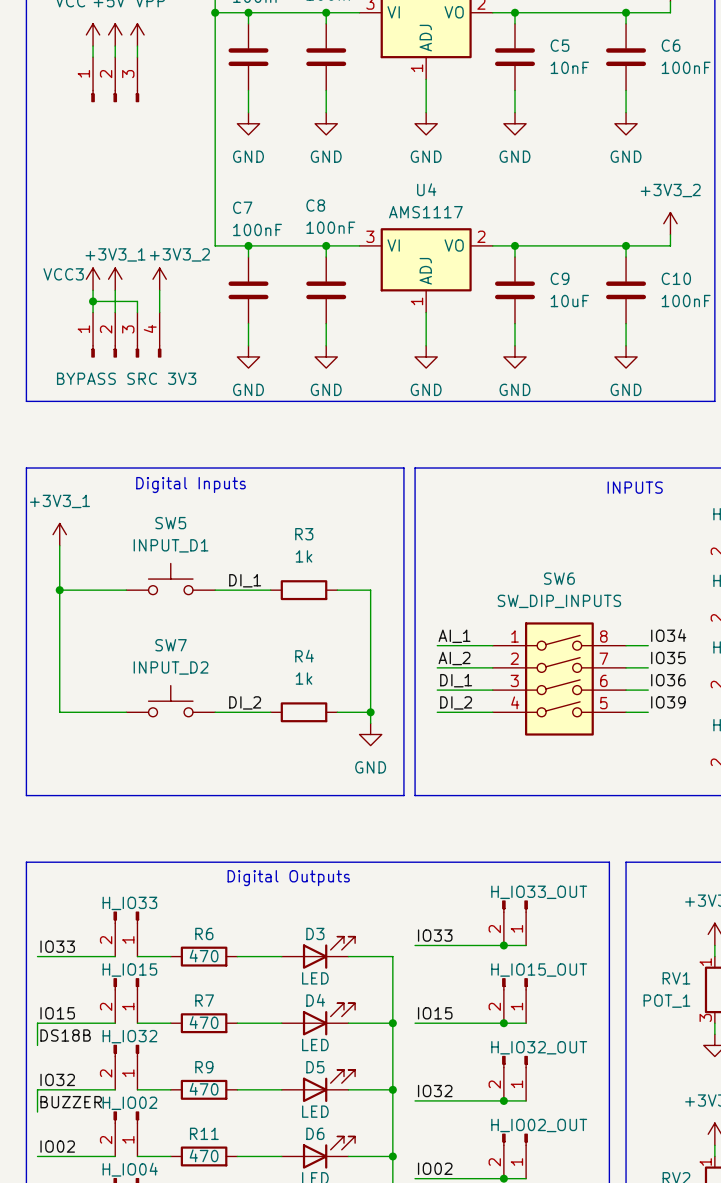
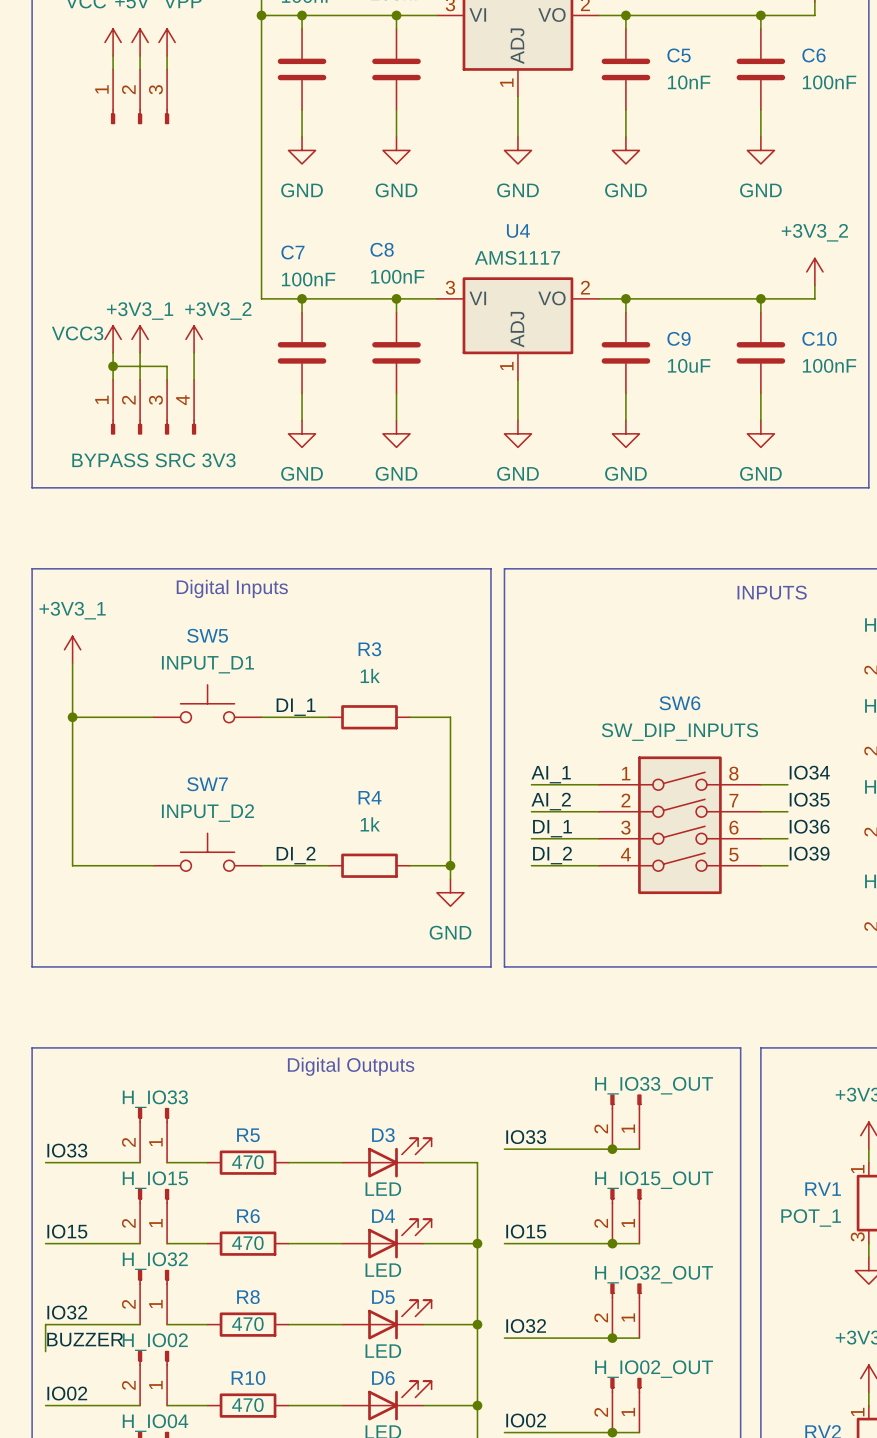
R6 name: R6 (204, 933) -> R5 (248, 1135)
R7 name: R7 (204, 1000) -> R6 (248, 1216)
wire: (37, 1023) (37, 1045) -> none
label: DS18B (65, 1035) -> none
R9 name: R9 (204, 1067) -> R8 (248, 1297)
R11 name: R11 (204, 1133) -> R10 (248, 1378)

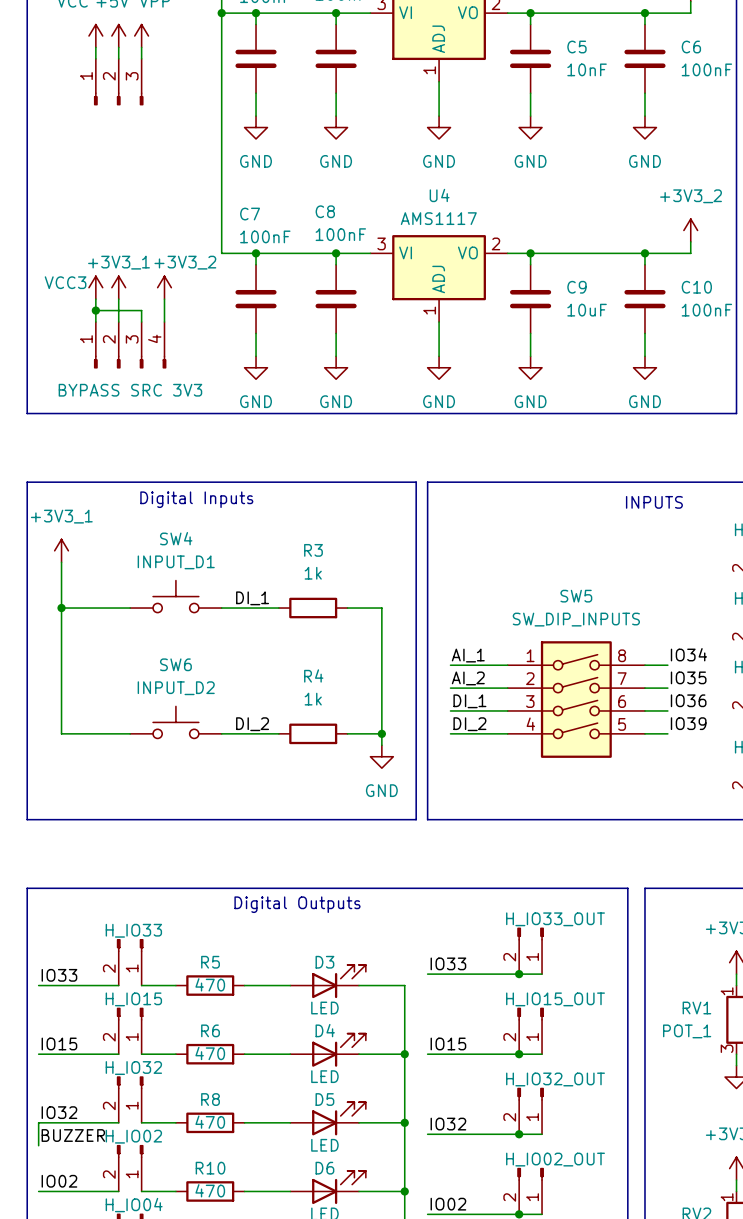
SW5 name: SW5 (207, 635) -> SW4 (176, 538)
SW6 name: SW6 (679, 703) -> SW5 (576, 596)
SW7 name: SW7 (207, 784) -> SW6 (175, 664)

